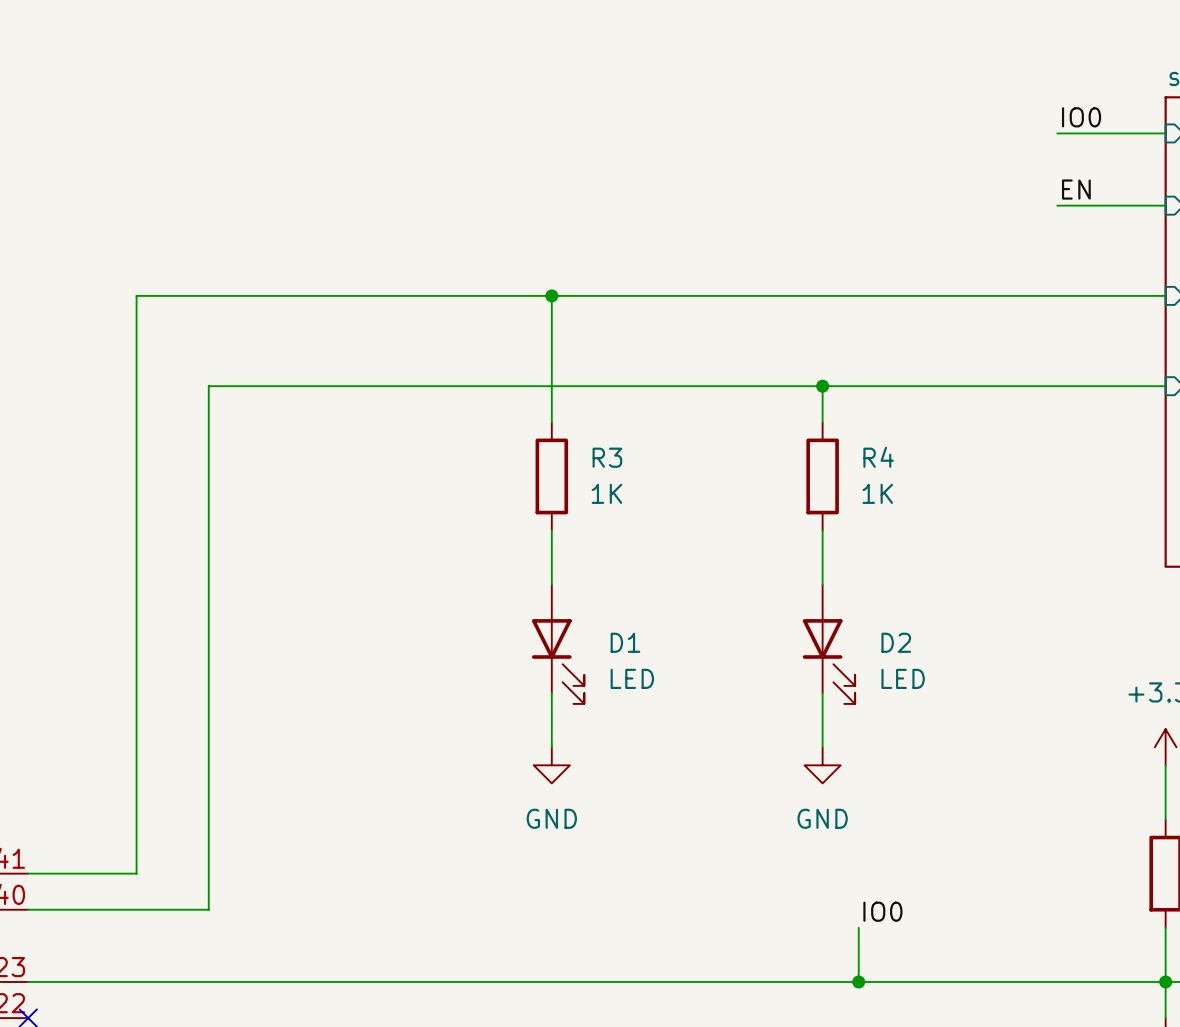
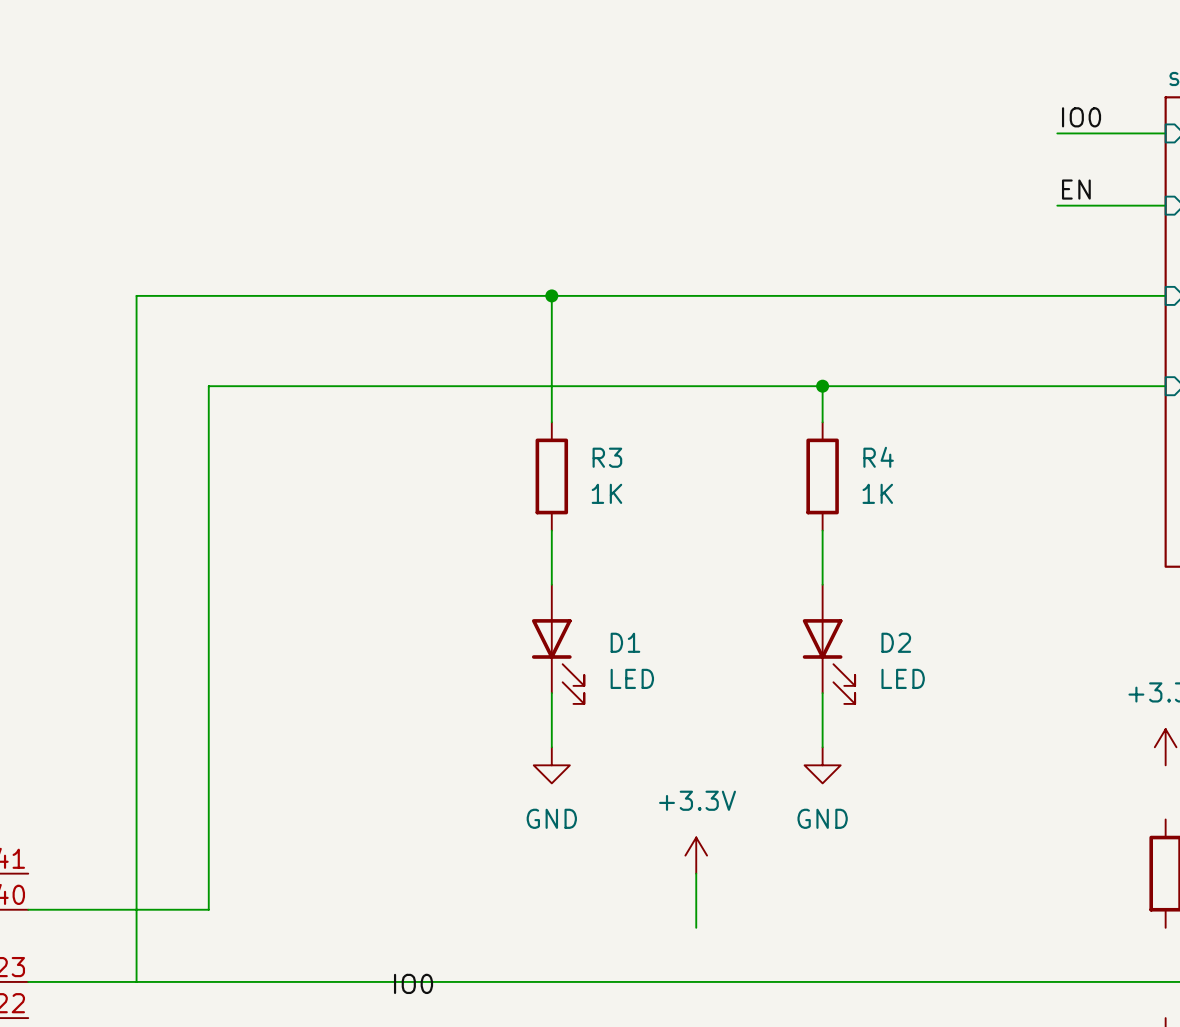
wire: (1165, 765) (1165, 819) -> none
power symbol: none -> +3.3V (696, 855)
wire: (28, 873) (136, 873) -> (136, 981) (136, 873)
label: IO0 (882, 911) -> none
wire: (858, 927) (858, 981) -> (696, 873) (696, 927)
wire: (1165, 927) (1165, 1018) -> none
junction: (858, 981) -> none
junction: (1165, 981) -> none
label: none -> IO0 (413, 983)
no-connect mark: (28, 1018) -> none

